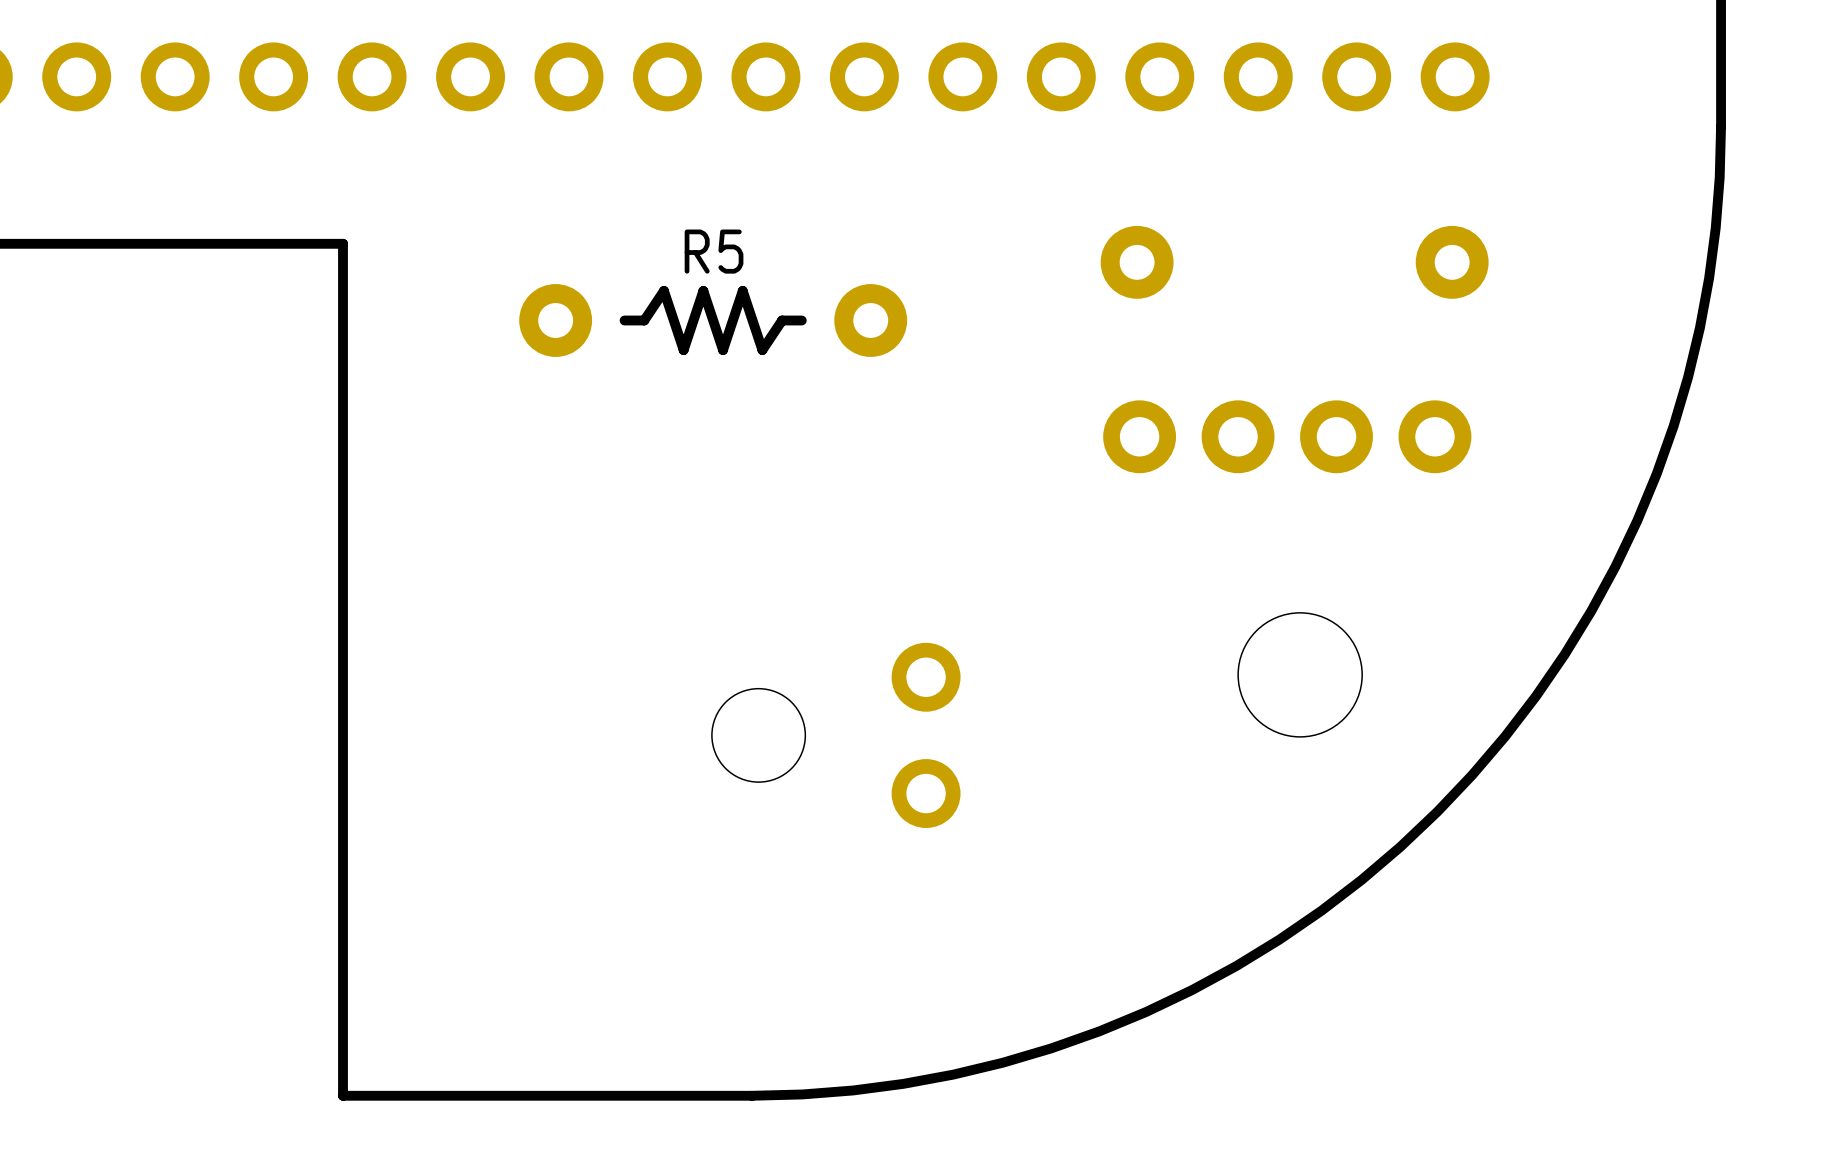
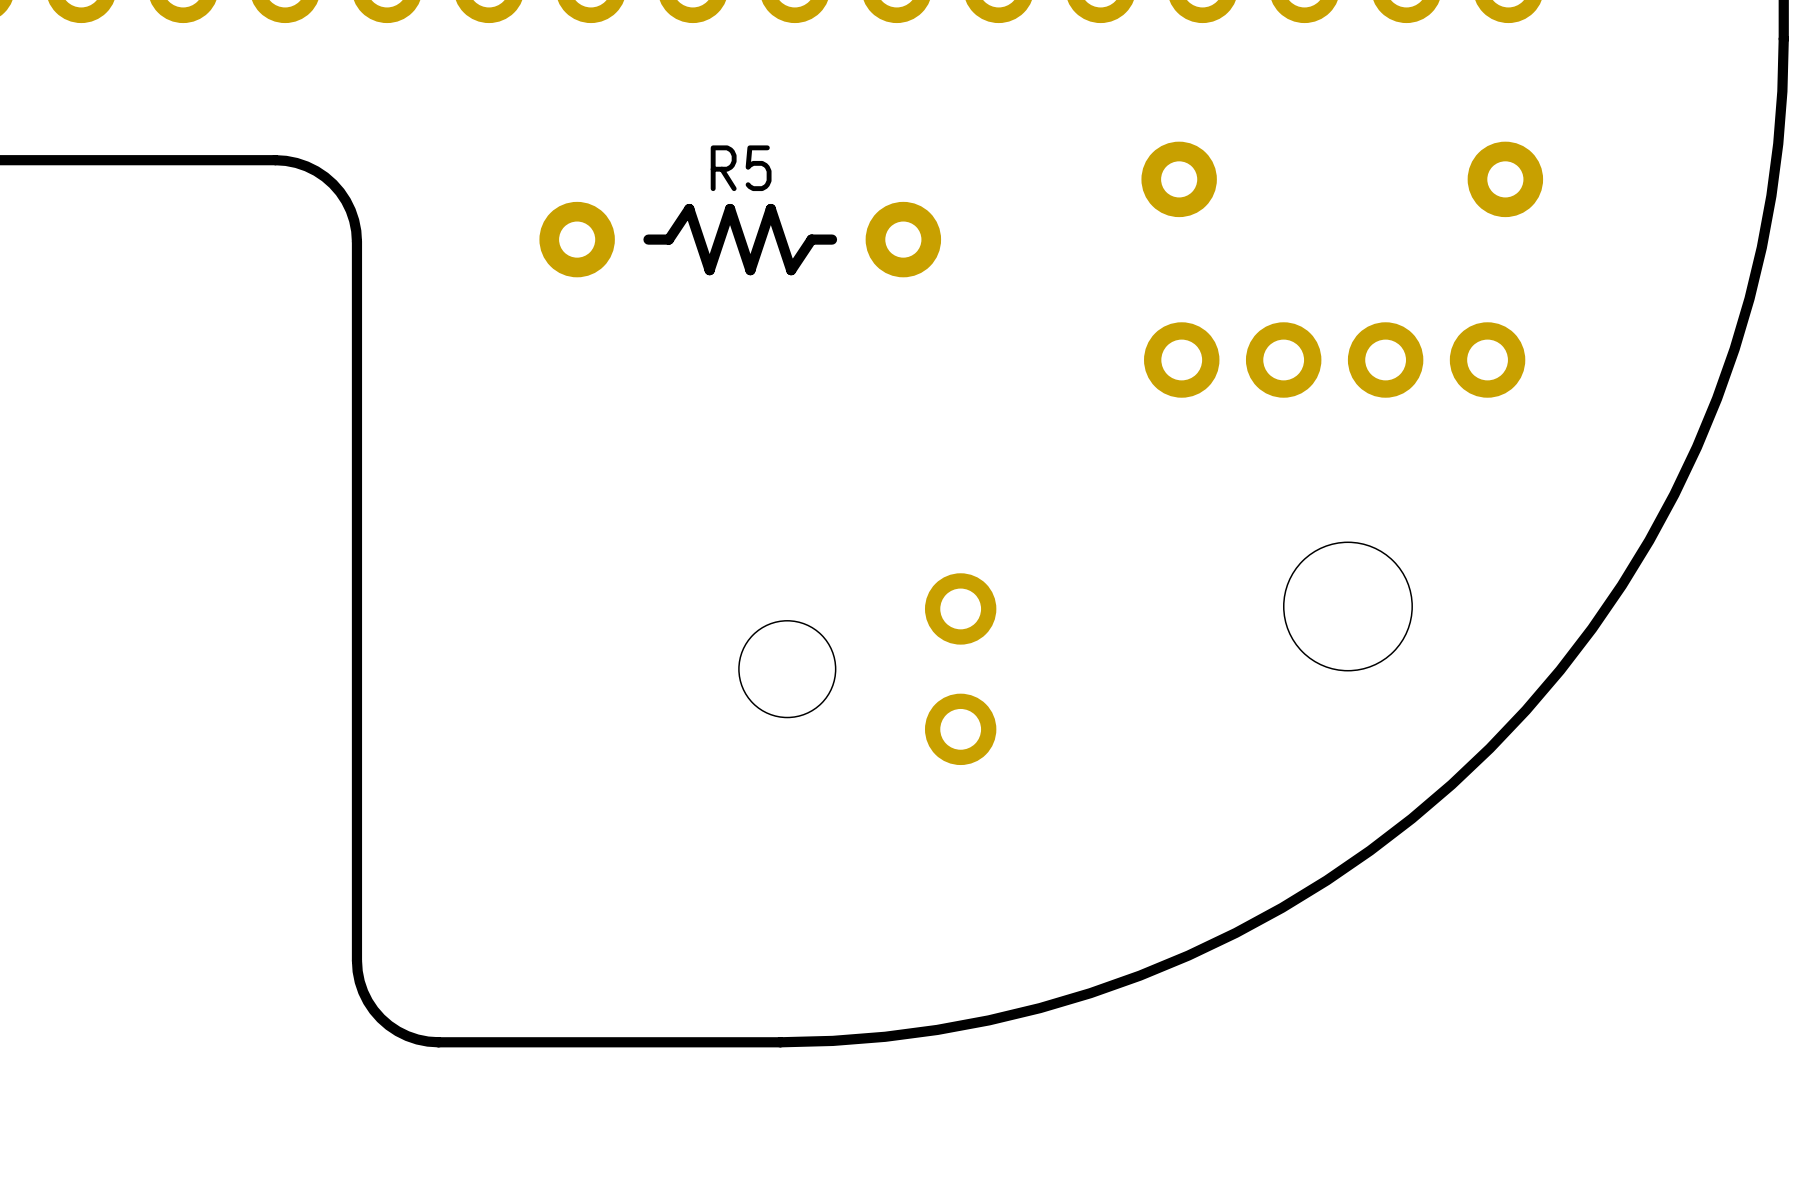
board edge: (264, 243) (343, 243) (343, 322) -> (275, 160) (306, 166) (333, 184) (350, 210) (356, 241)
board edge: (343, 1017) (343, 1095) (421, 1095) -> (356, 960) (363, 991) (380, 1018) (407, 1036) (438, 1042)

